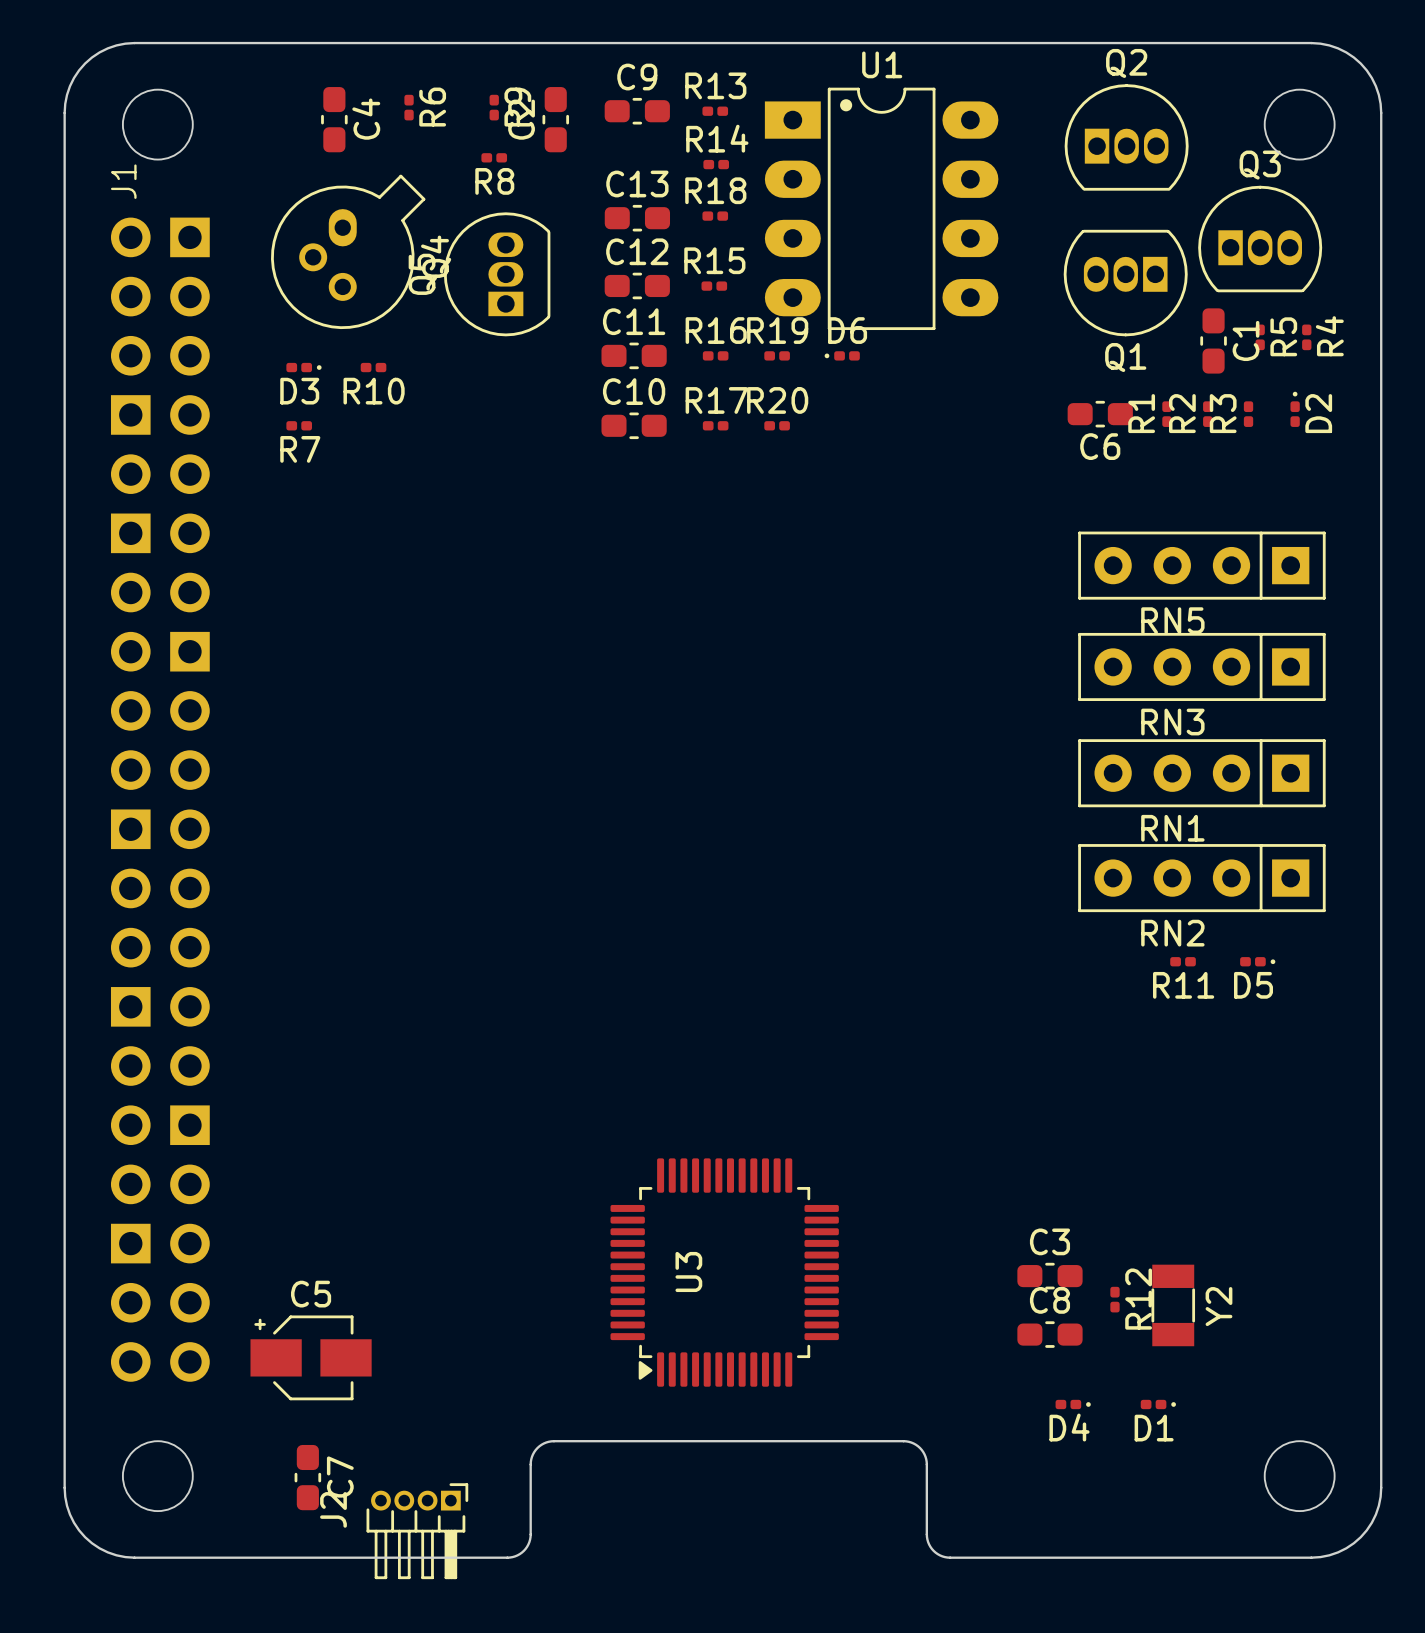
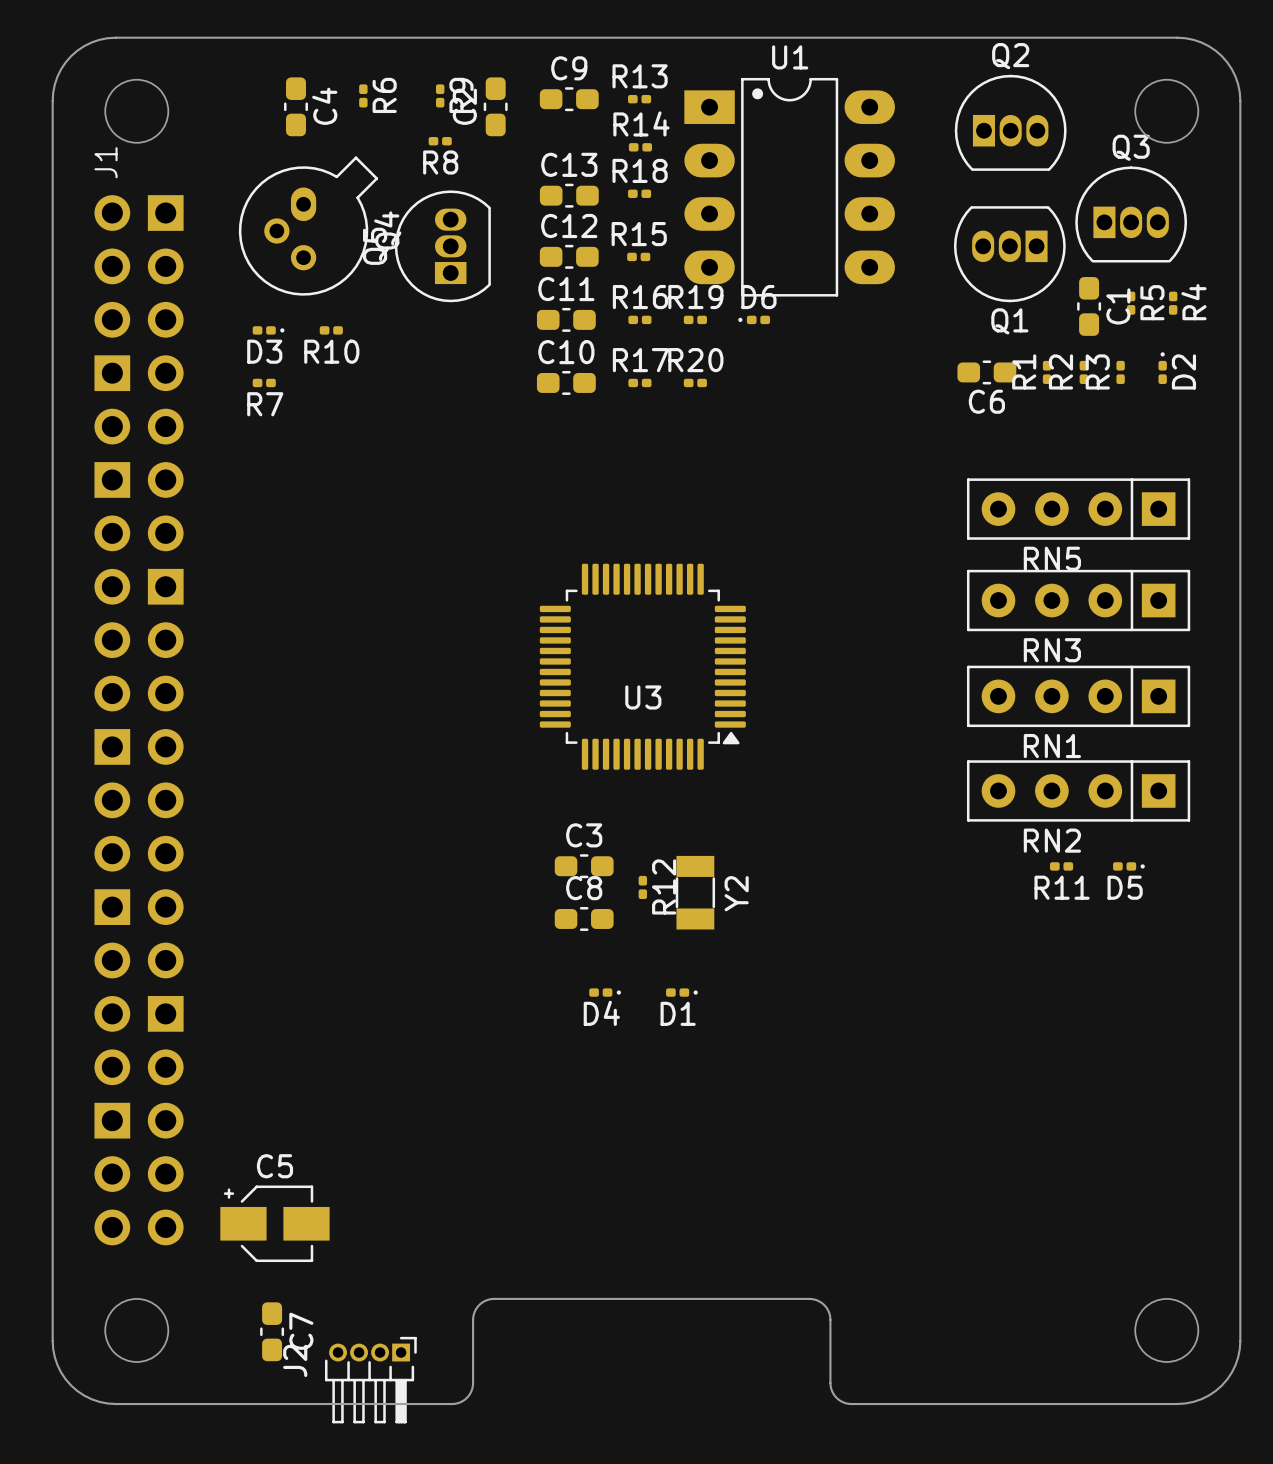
U3 rotation: 0° (724, 1272) -> 90° counterclockwise (642, 666)
U3 position: (724, 1272) -> (642, 666)
C3 position: (1049, 1276) -> (584, 866)
R12 position: (1114, 1299) -> (642, 887)
Y2 position: (1173, 1305) -> (695, 892)
C8 position: (1049, 1334) -> (584, 918)
D4 position: (1073, 1404) -> (605, 992)
D1 position: (1158, 1404) -> (681, 992)

